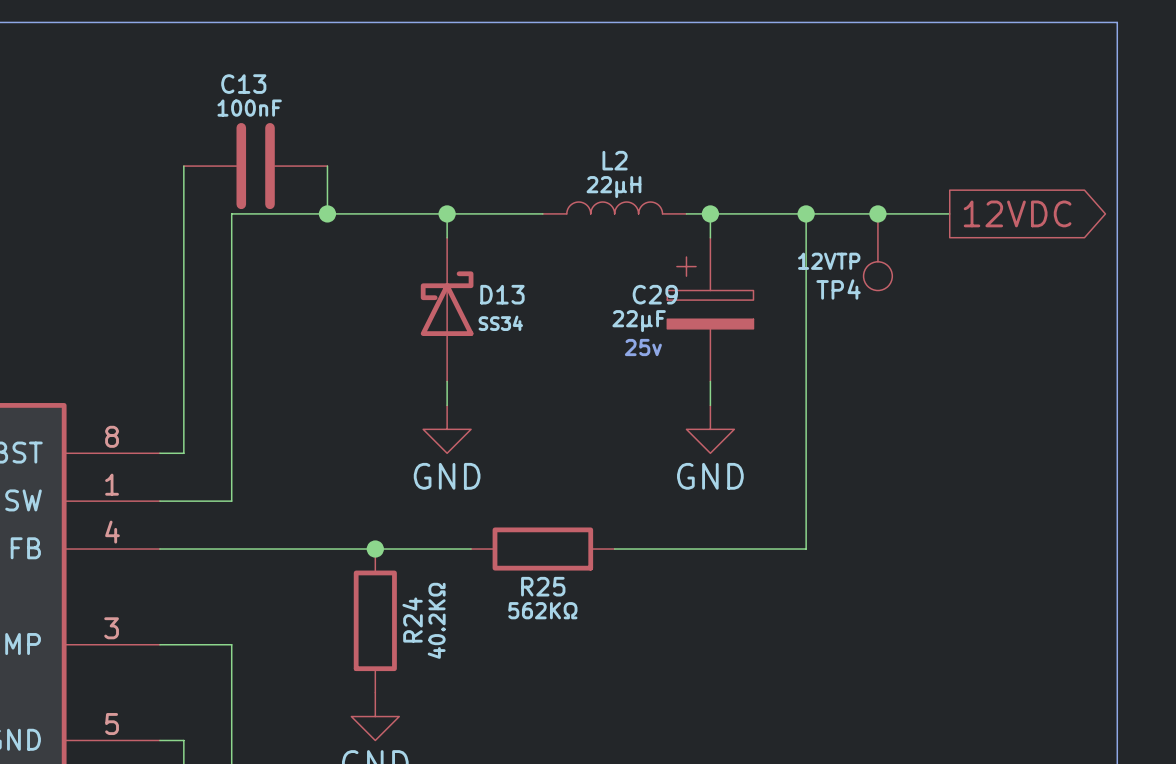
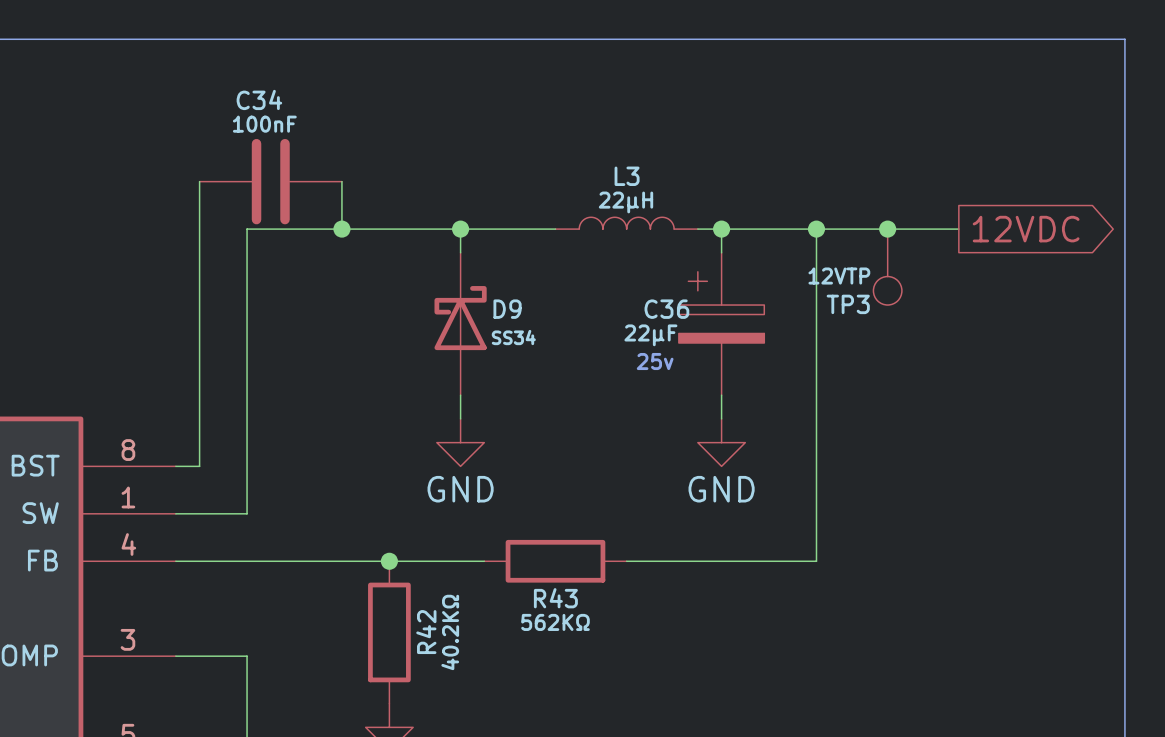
C13 name: C13 (243, 84) -> C34 (259, 99)
L2 name: L2 (615, 160) -> L3 (627, 176)
TP4 name: TP4 (838, 289) -> TP3 (848, 304)
D13 name: D13 (502, 294) -> D9 (507, 309)
C29 name: C29 (655, 294) -> C36 (666, 309)
R25 name: R25 (543, 586) -> R43 (555, 598)
R24 name: R24 (412, 620) -> R42 (426, 632)

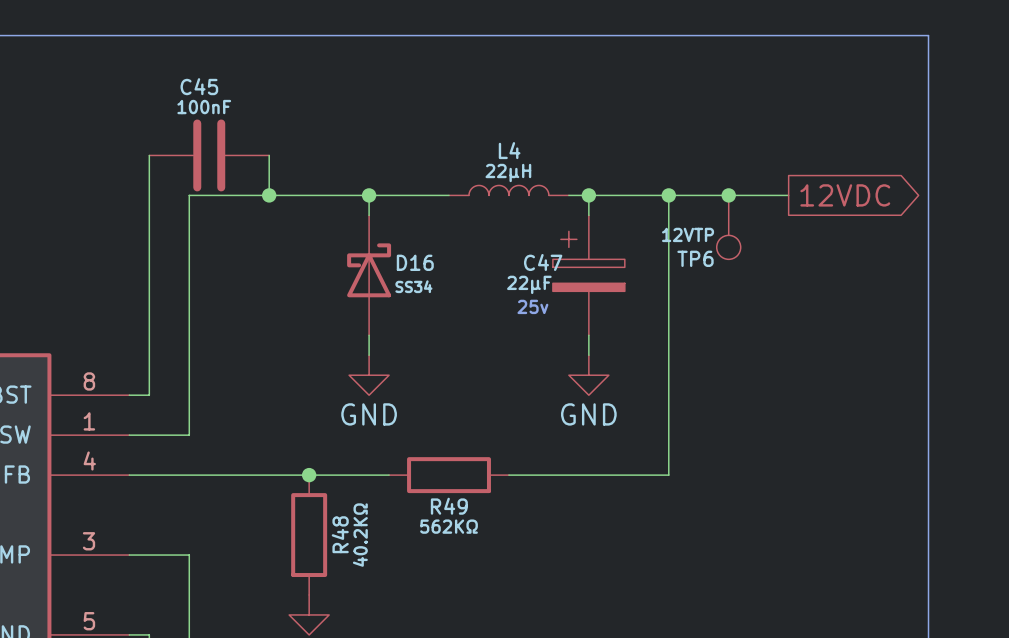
C34 name: C34 (259, 99) -> C45 (199, 86)
L3 name: L3 (627, 176) -> L4 (509, 150)
TP3 name: TP3 (848, 304) -> TP6 (695, 258)
D9 name: D9 (507, 309) -> D16 (415, 262)
C36 name: C36 (666, 309) -> C47 (543, 262)
R43 name: R43 (555, 598) -> R49 (449, 506)
R42 name: R42 (426, 632) -> R48 (340, 534)

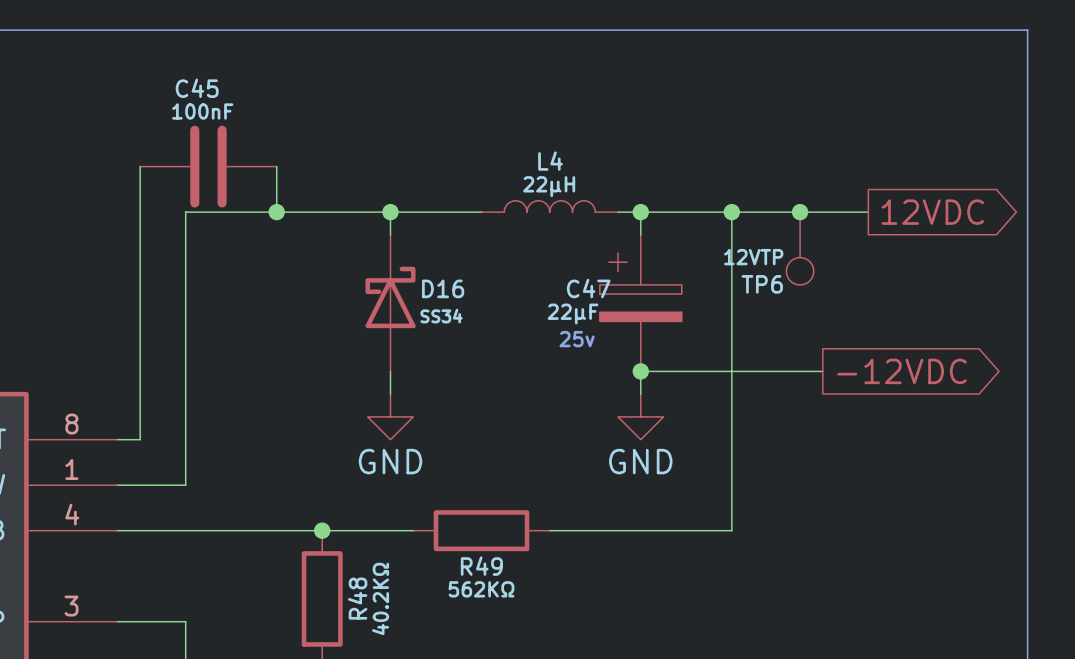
wire: none -> (640, 371) (822, 371)
junction: none -> (640, 371)
global label: none -> -12VDC (901, 371)

